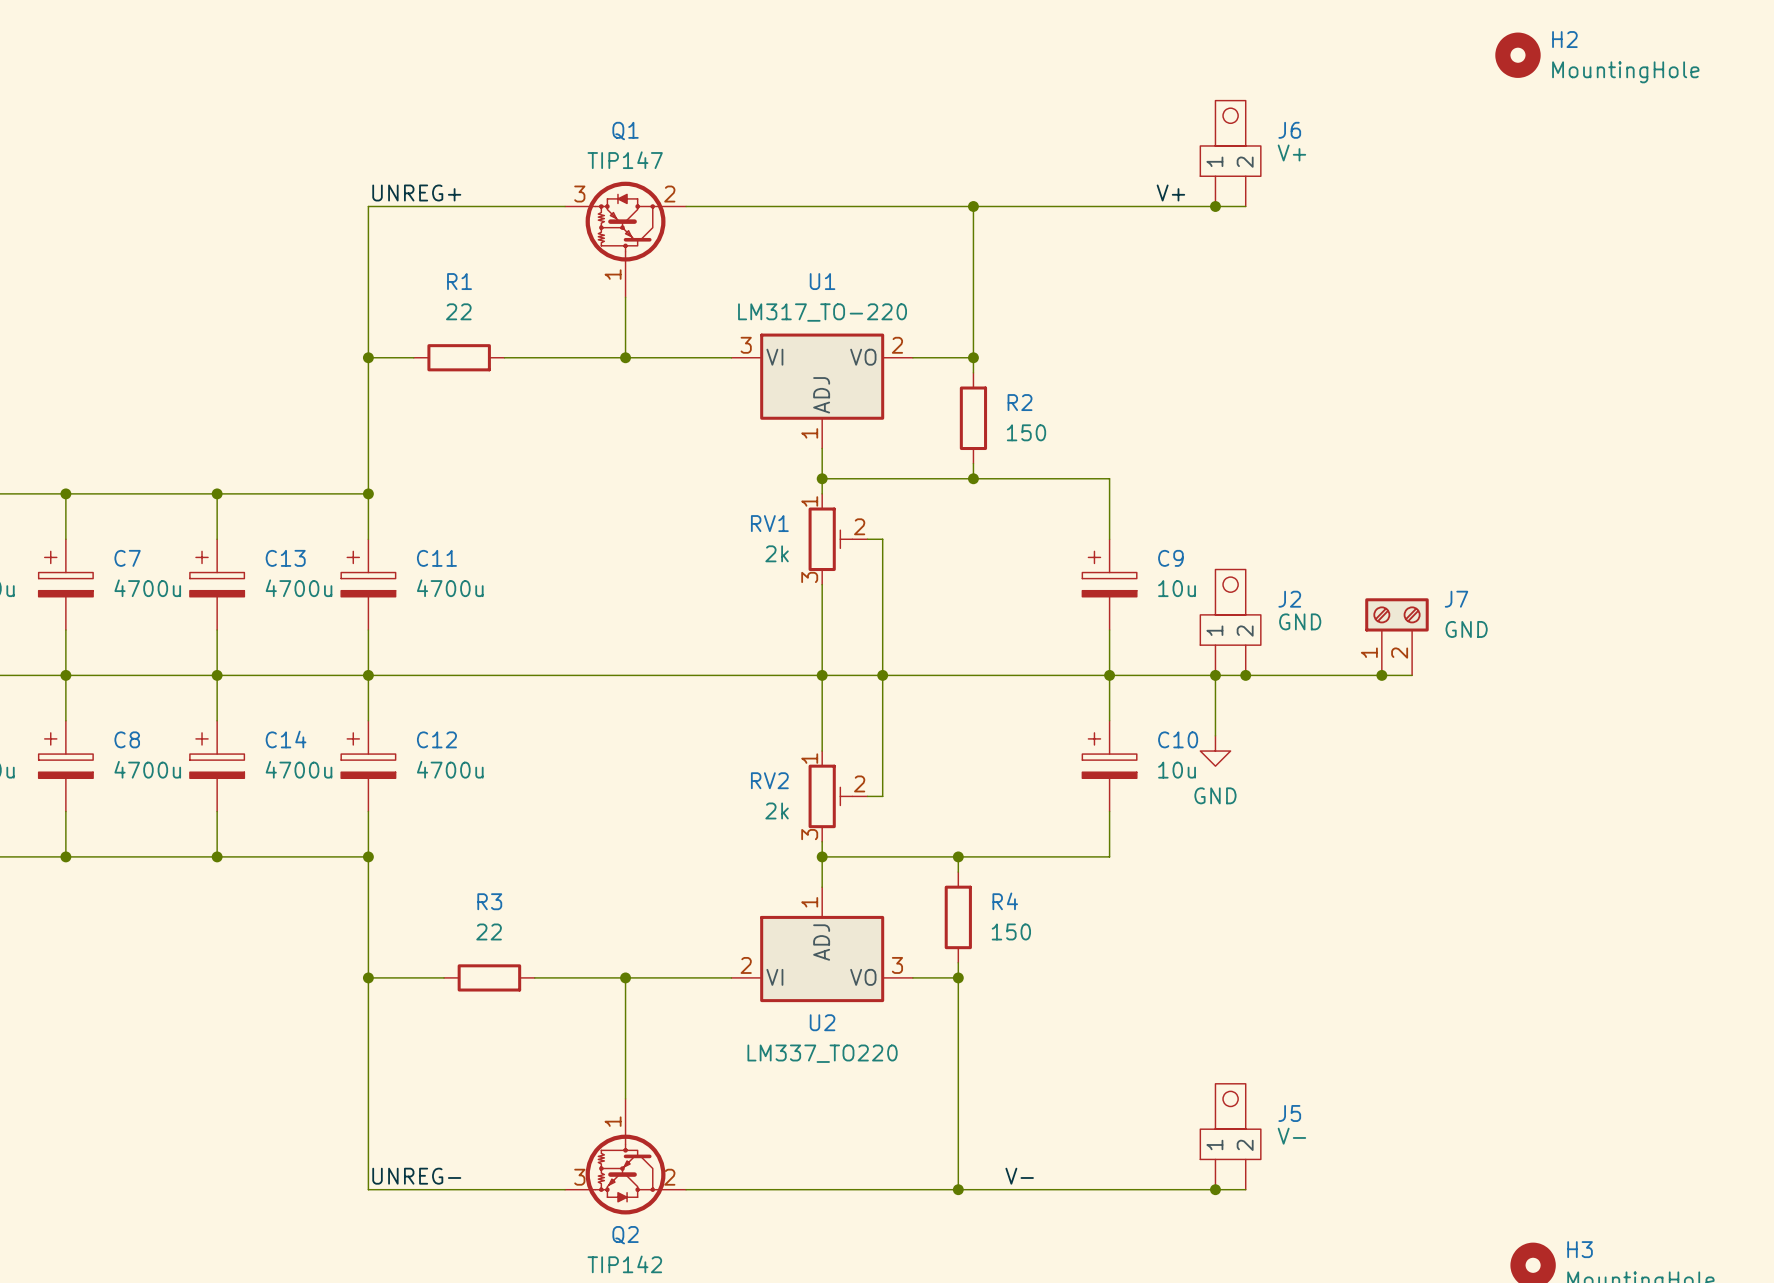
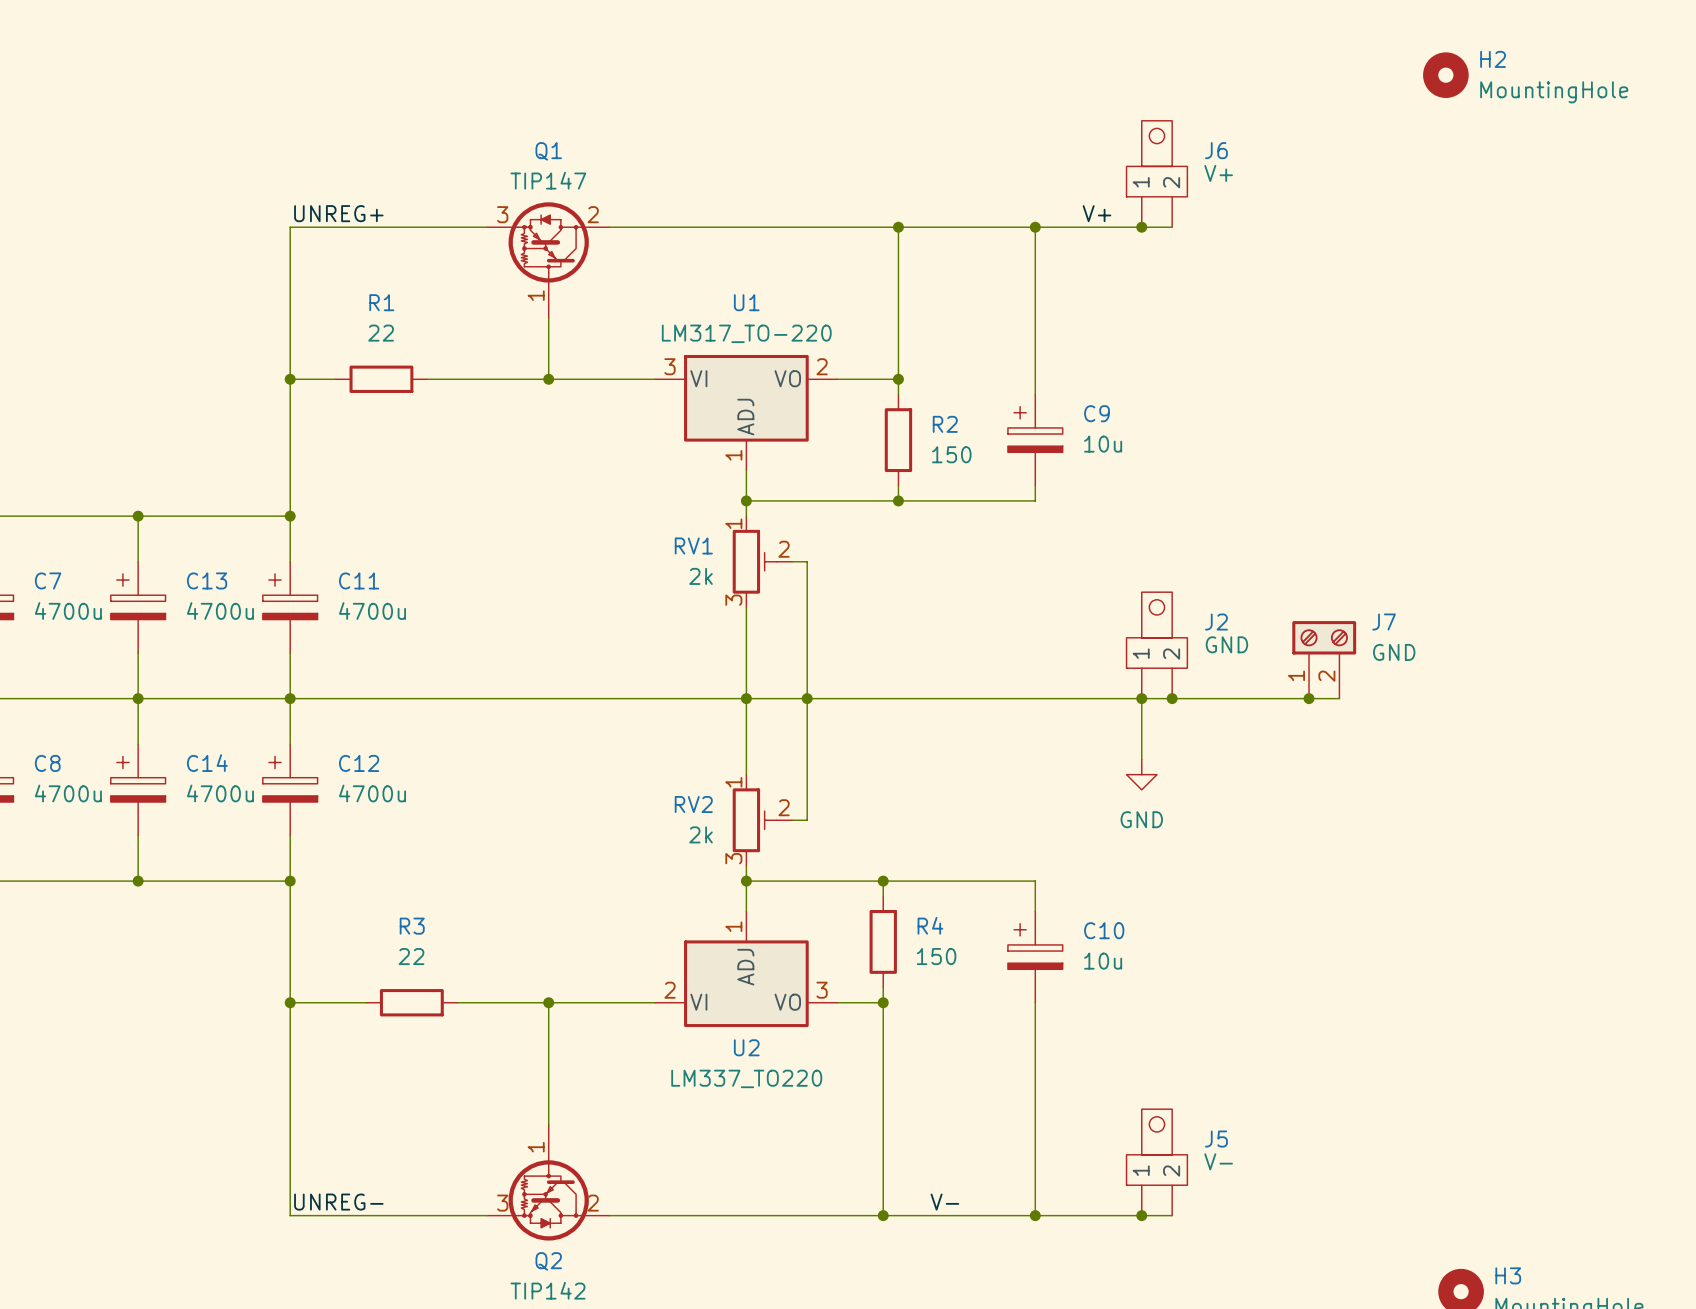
wire: none -> (1035, 227) (1035, 394)
junction: none -> (1035, 227)
wire: (1109, 478) (1109, 539) -> (1035, 500) (1035, 485)
C9 position: (1109, 584) -> (1035, 440)
wire: (1109, 630) (1109, 720) -> none
junction: (1109, 675) -> none
C10 position: (1109, 766) -> (1035, 957)
wire: (1109, 811) (1109, 856) -> (1035, 911) (1035, 881)
wire: none -> (1035, 1002) (1035, 1215)
junction: none -> (1035, 1215)

